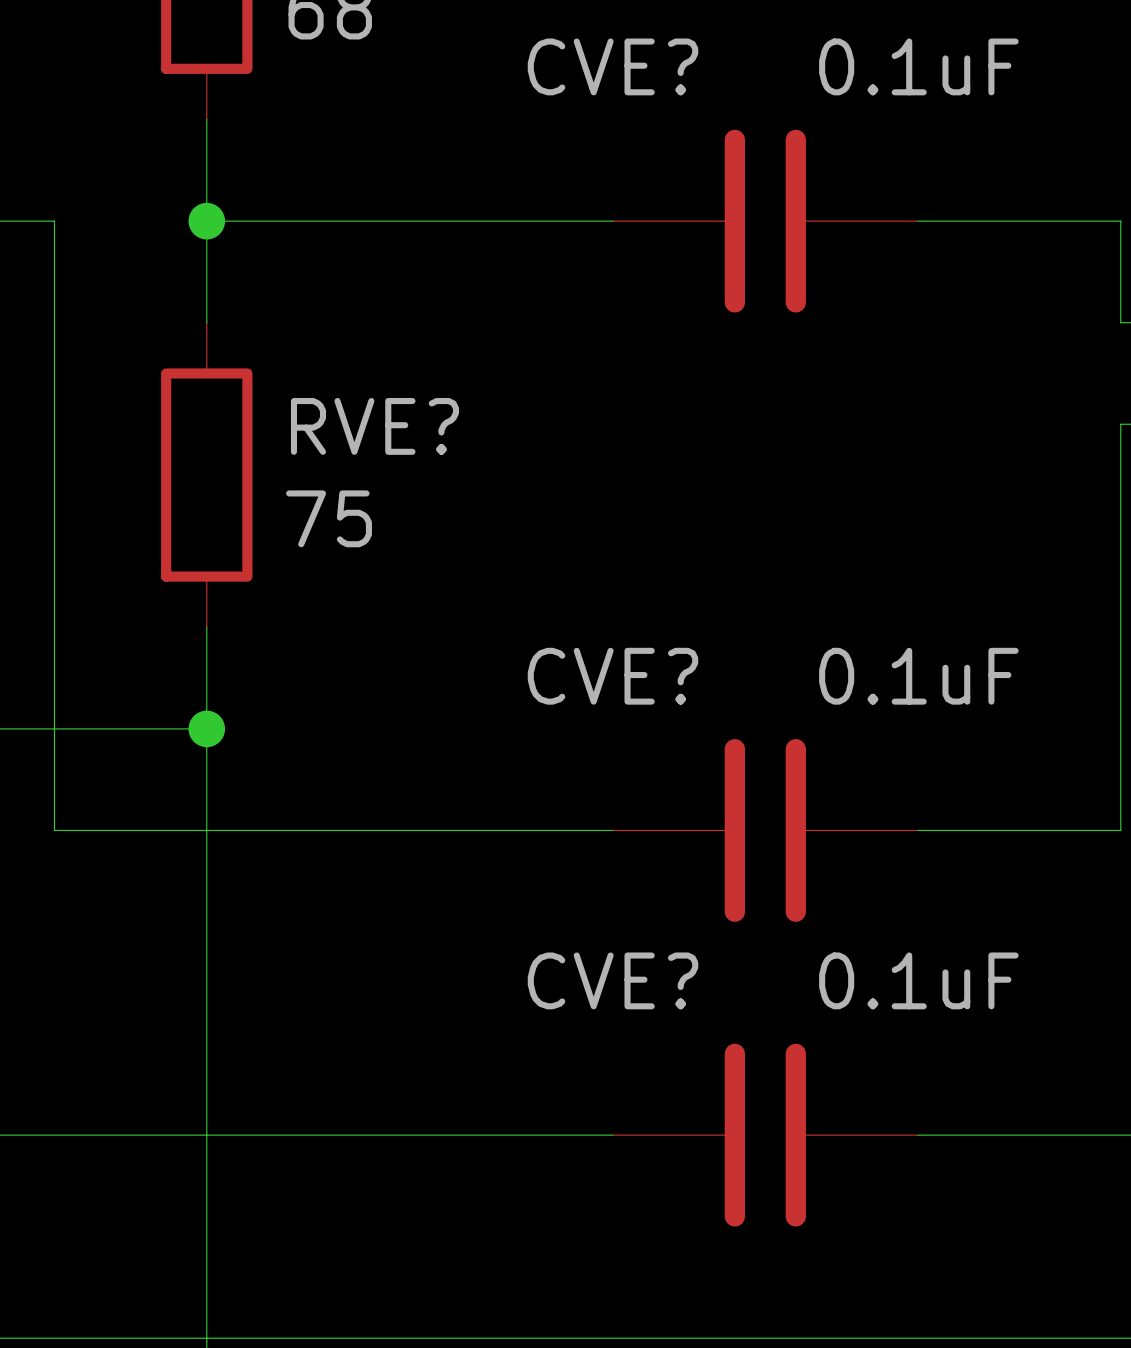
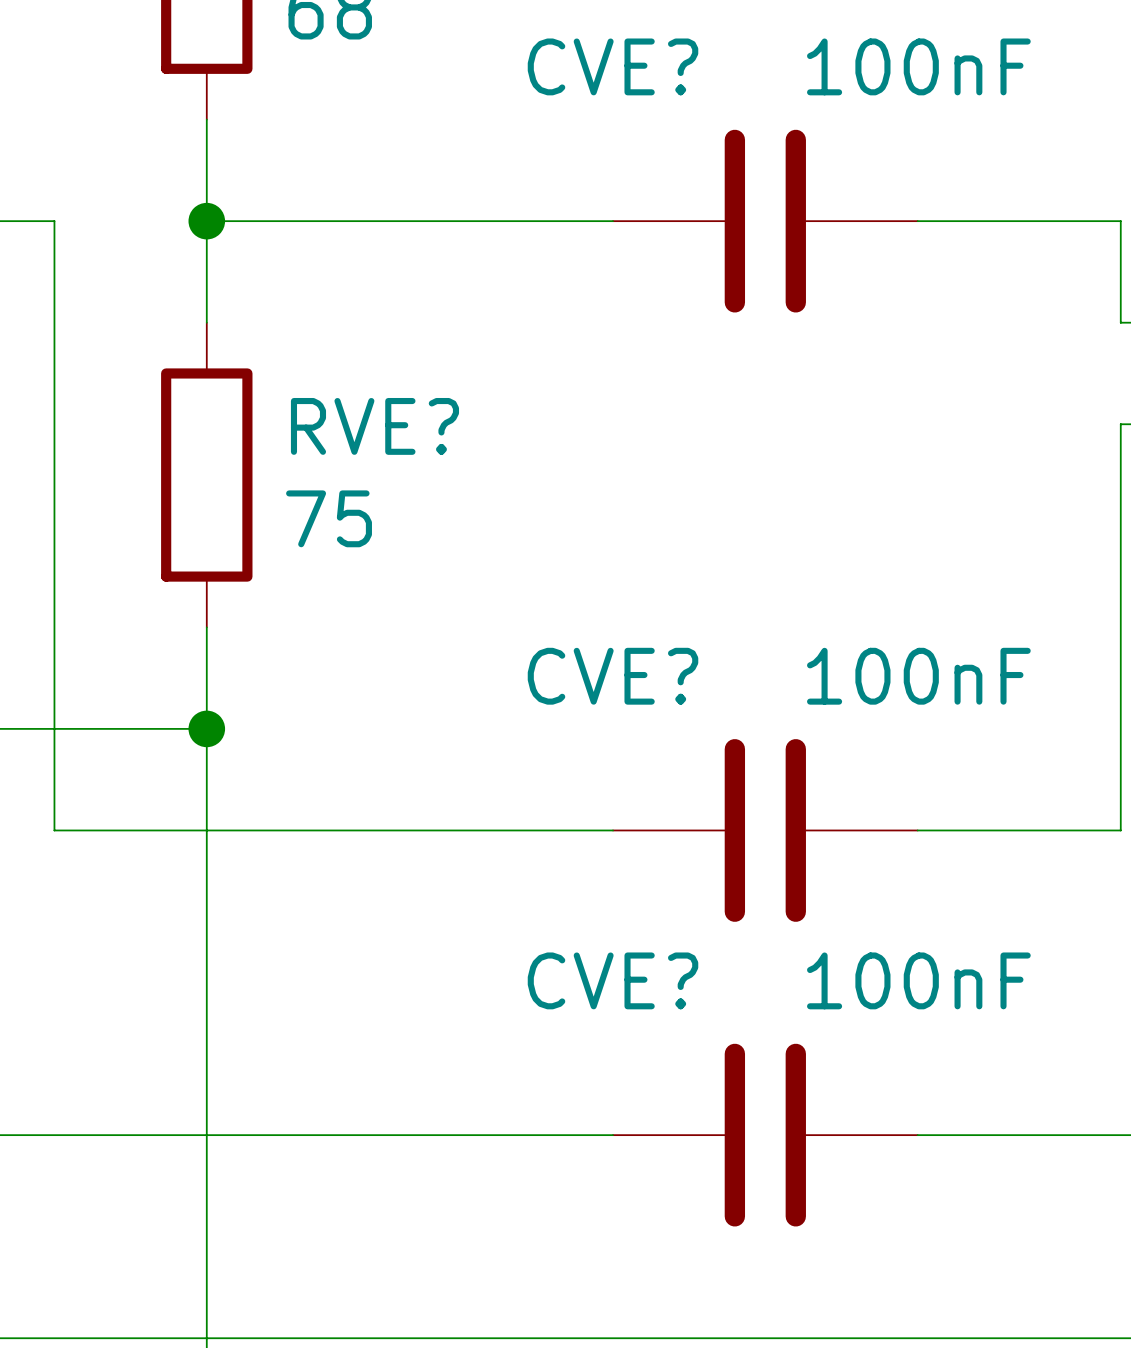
CVE? value: 0.1uF (918, 66) -> 100nF (918, 66)
CVE? value: 0.1uF (918, 676) -> 100nF (918, 676)
CVE? value: 0.1uF (918, 980) -> 100nF (918, 980)

